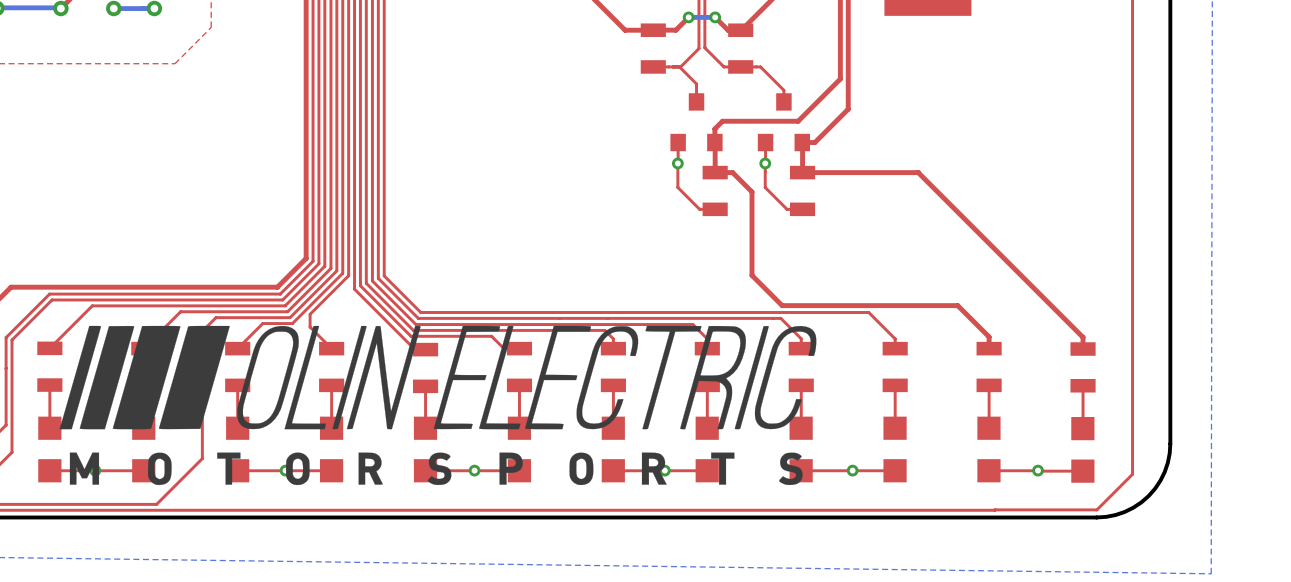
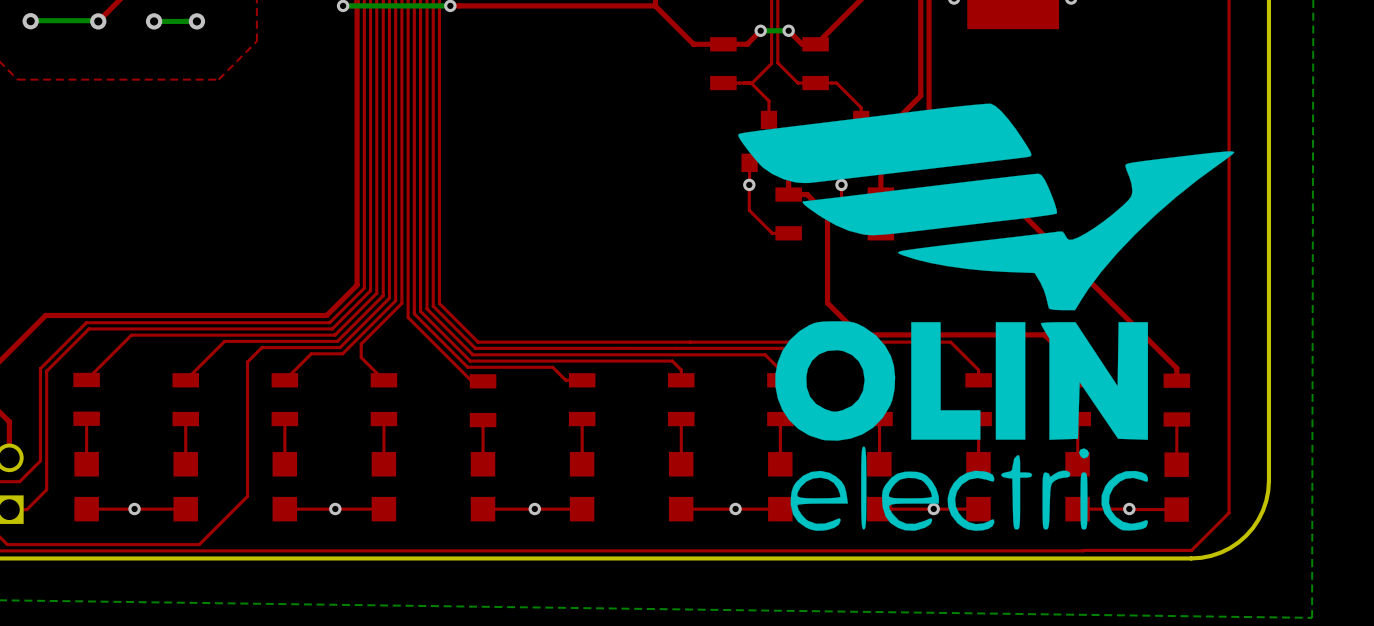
drawing: none -> [738, 103, 1235, 531]
drawing: [59, 325, 817, 486] -> none

